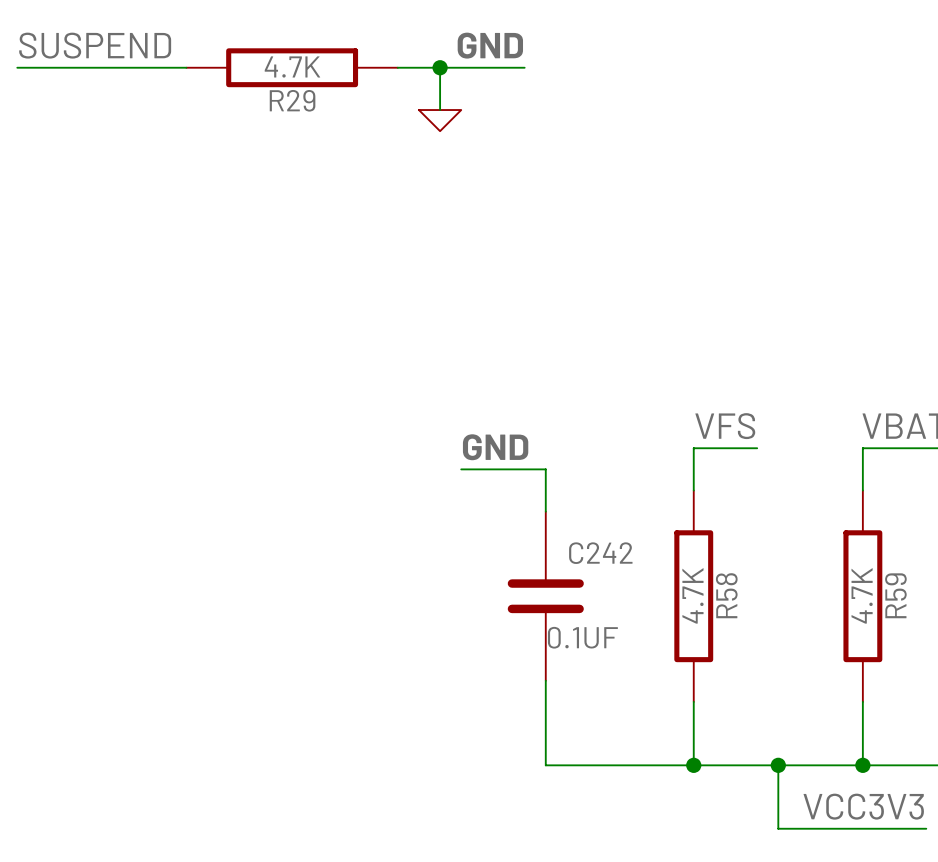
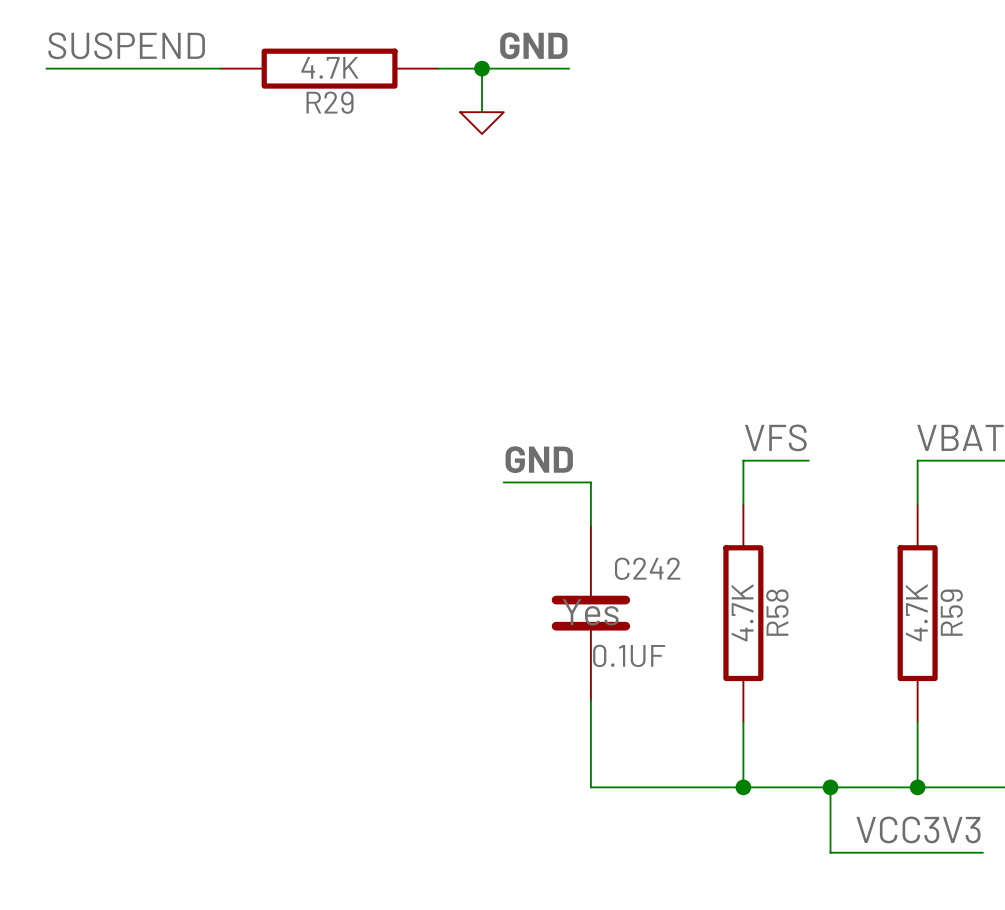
C242 text: none -> Yes (590, 612)

